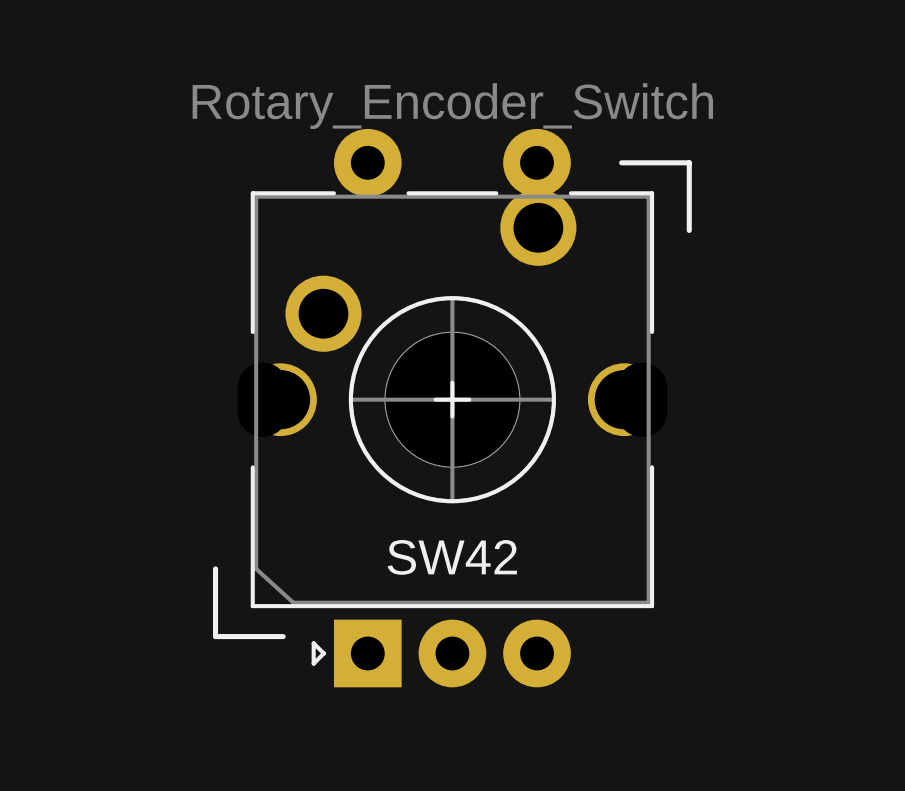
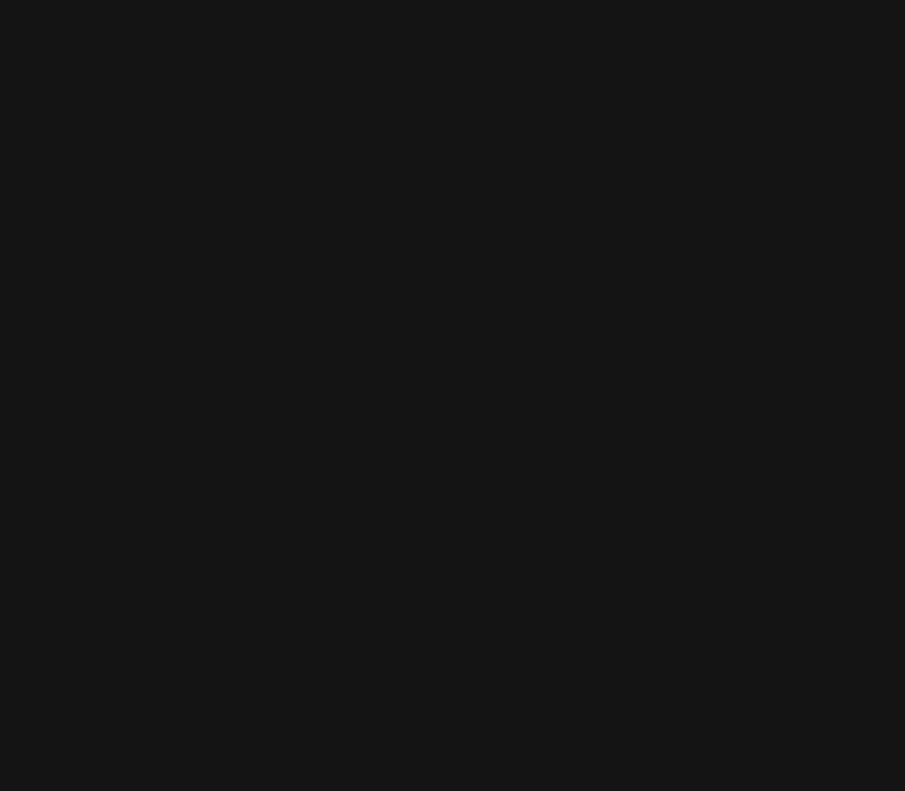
SW42: Rotary_Encoder_Switch (452, 408) -> none

